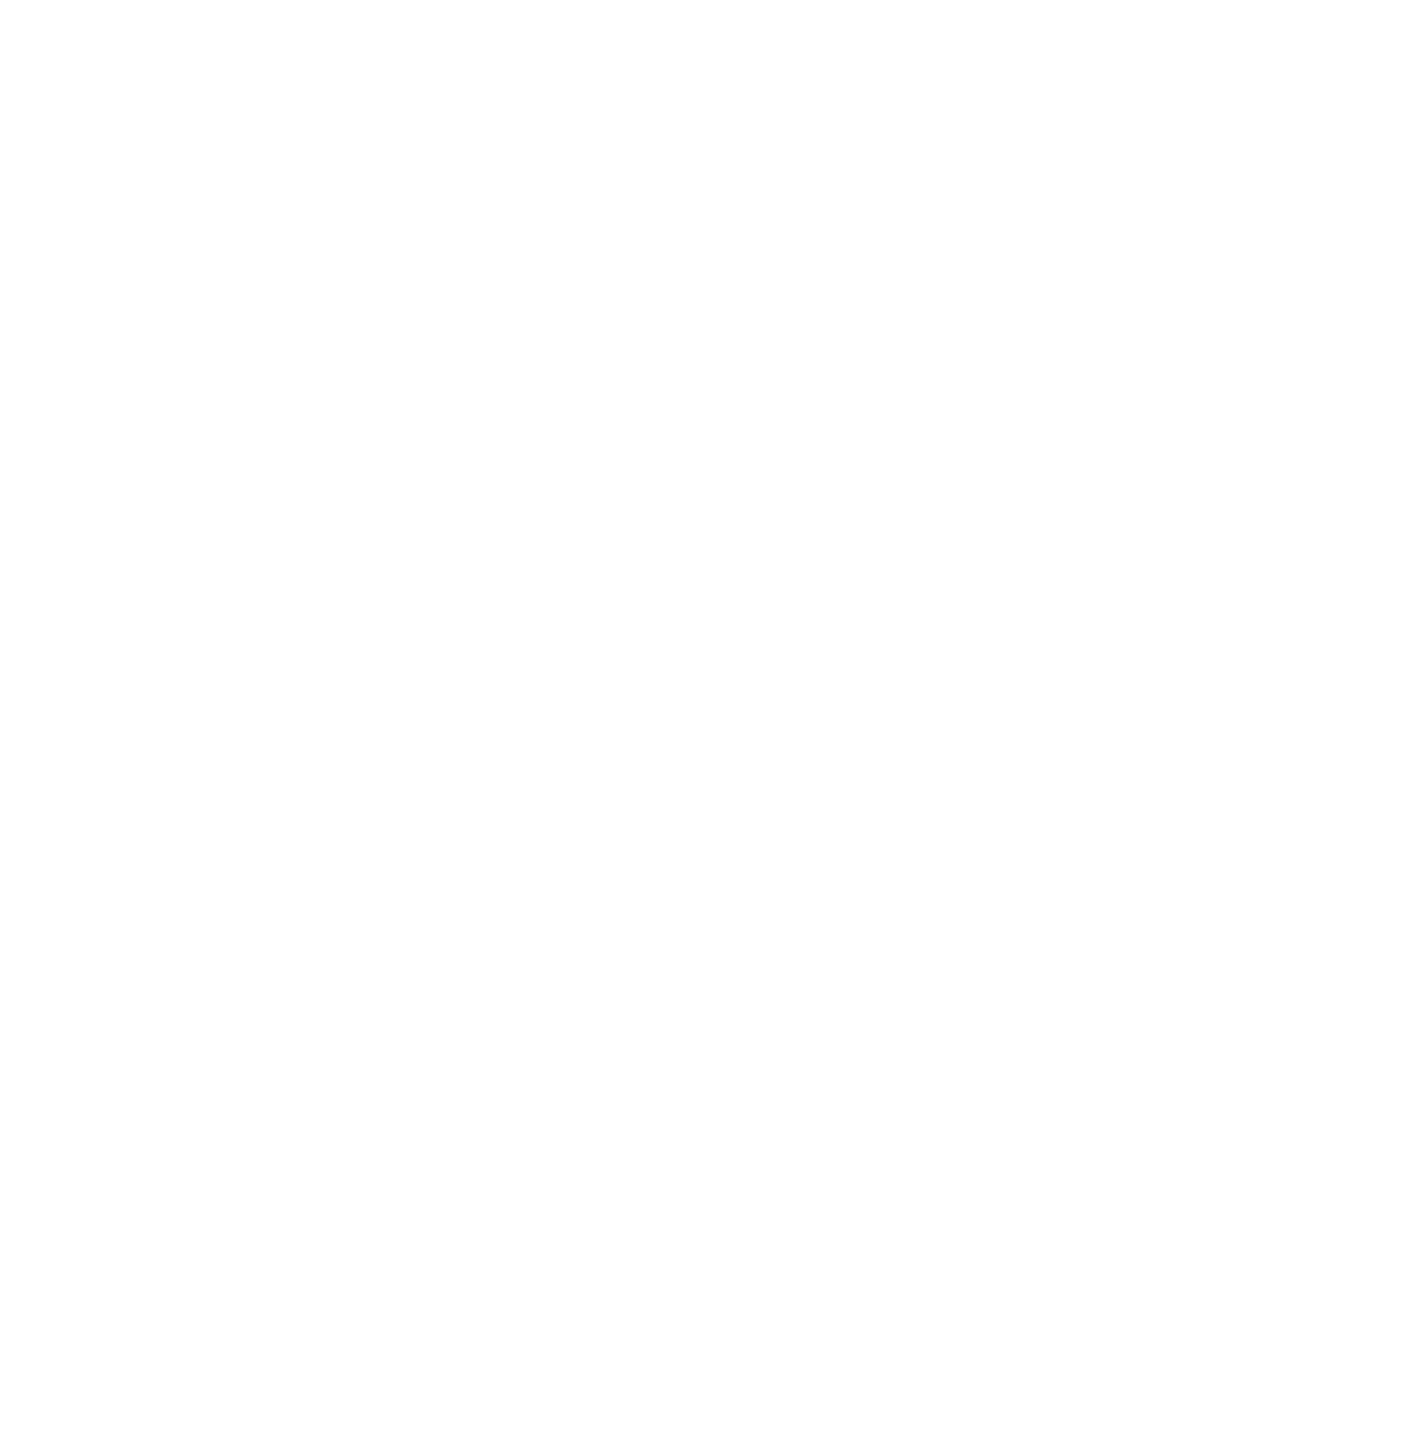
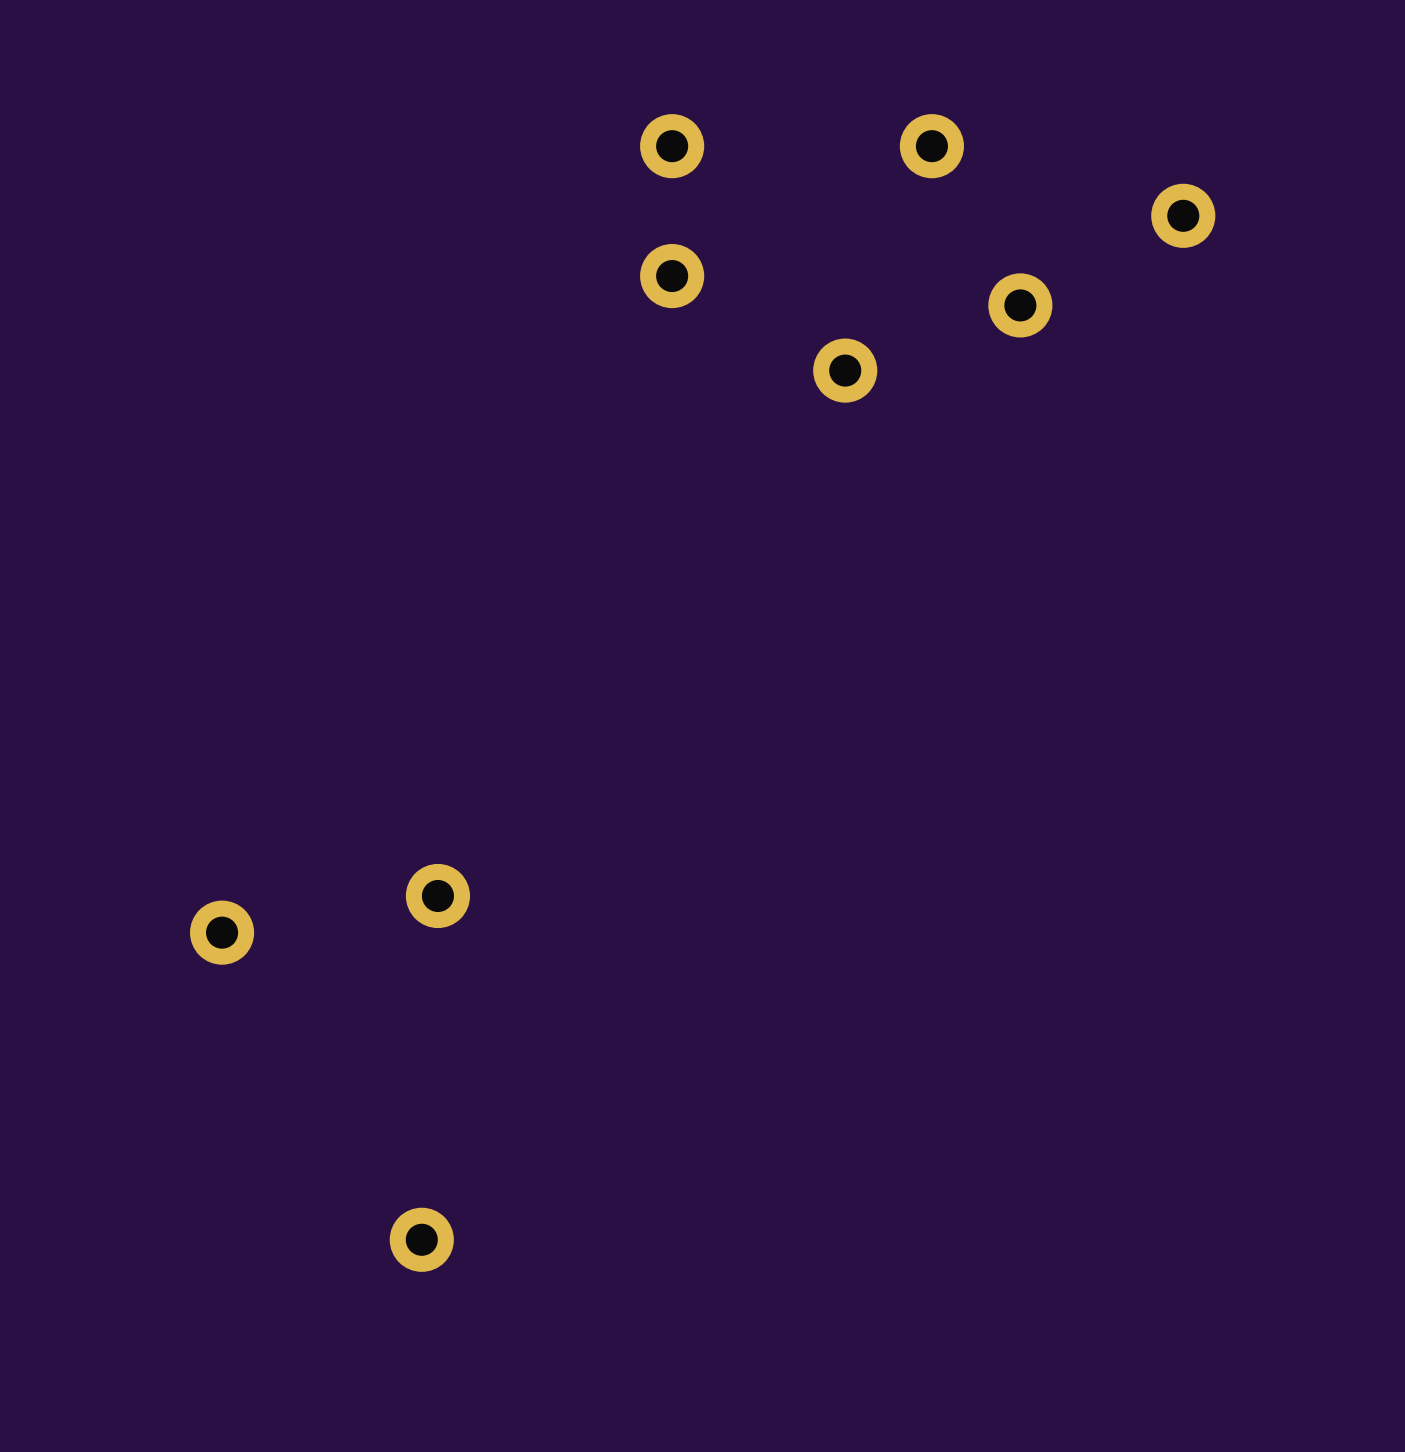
part: none -> (672, 146)
part: none -> (931, 146)
part: none -> (1183, 215)
part: none -> (672, 276)
part: none -> (1020, 305)
part: none -> (845, 370)
part: none -> (437, 895)
part: none -> (222, 932)
part: none -> (421, 1239)

